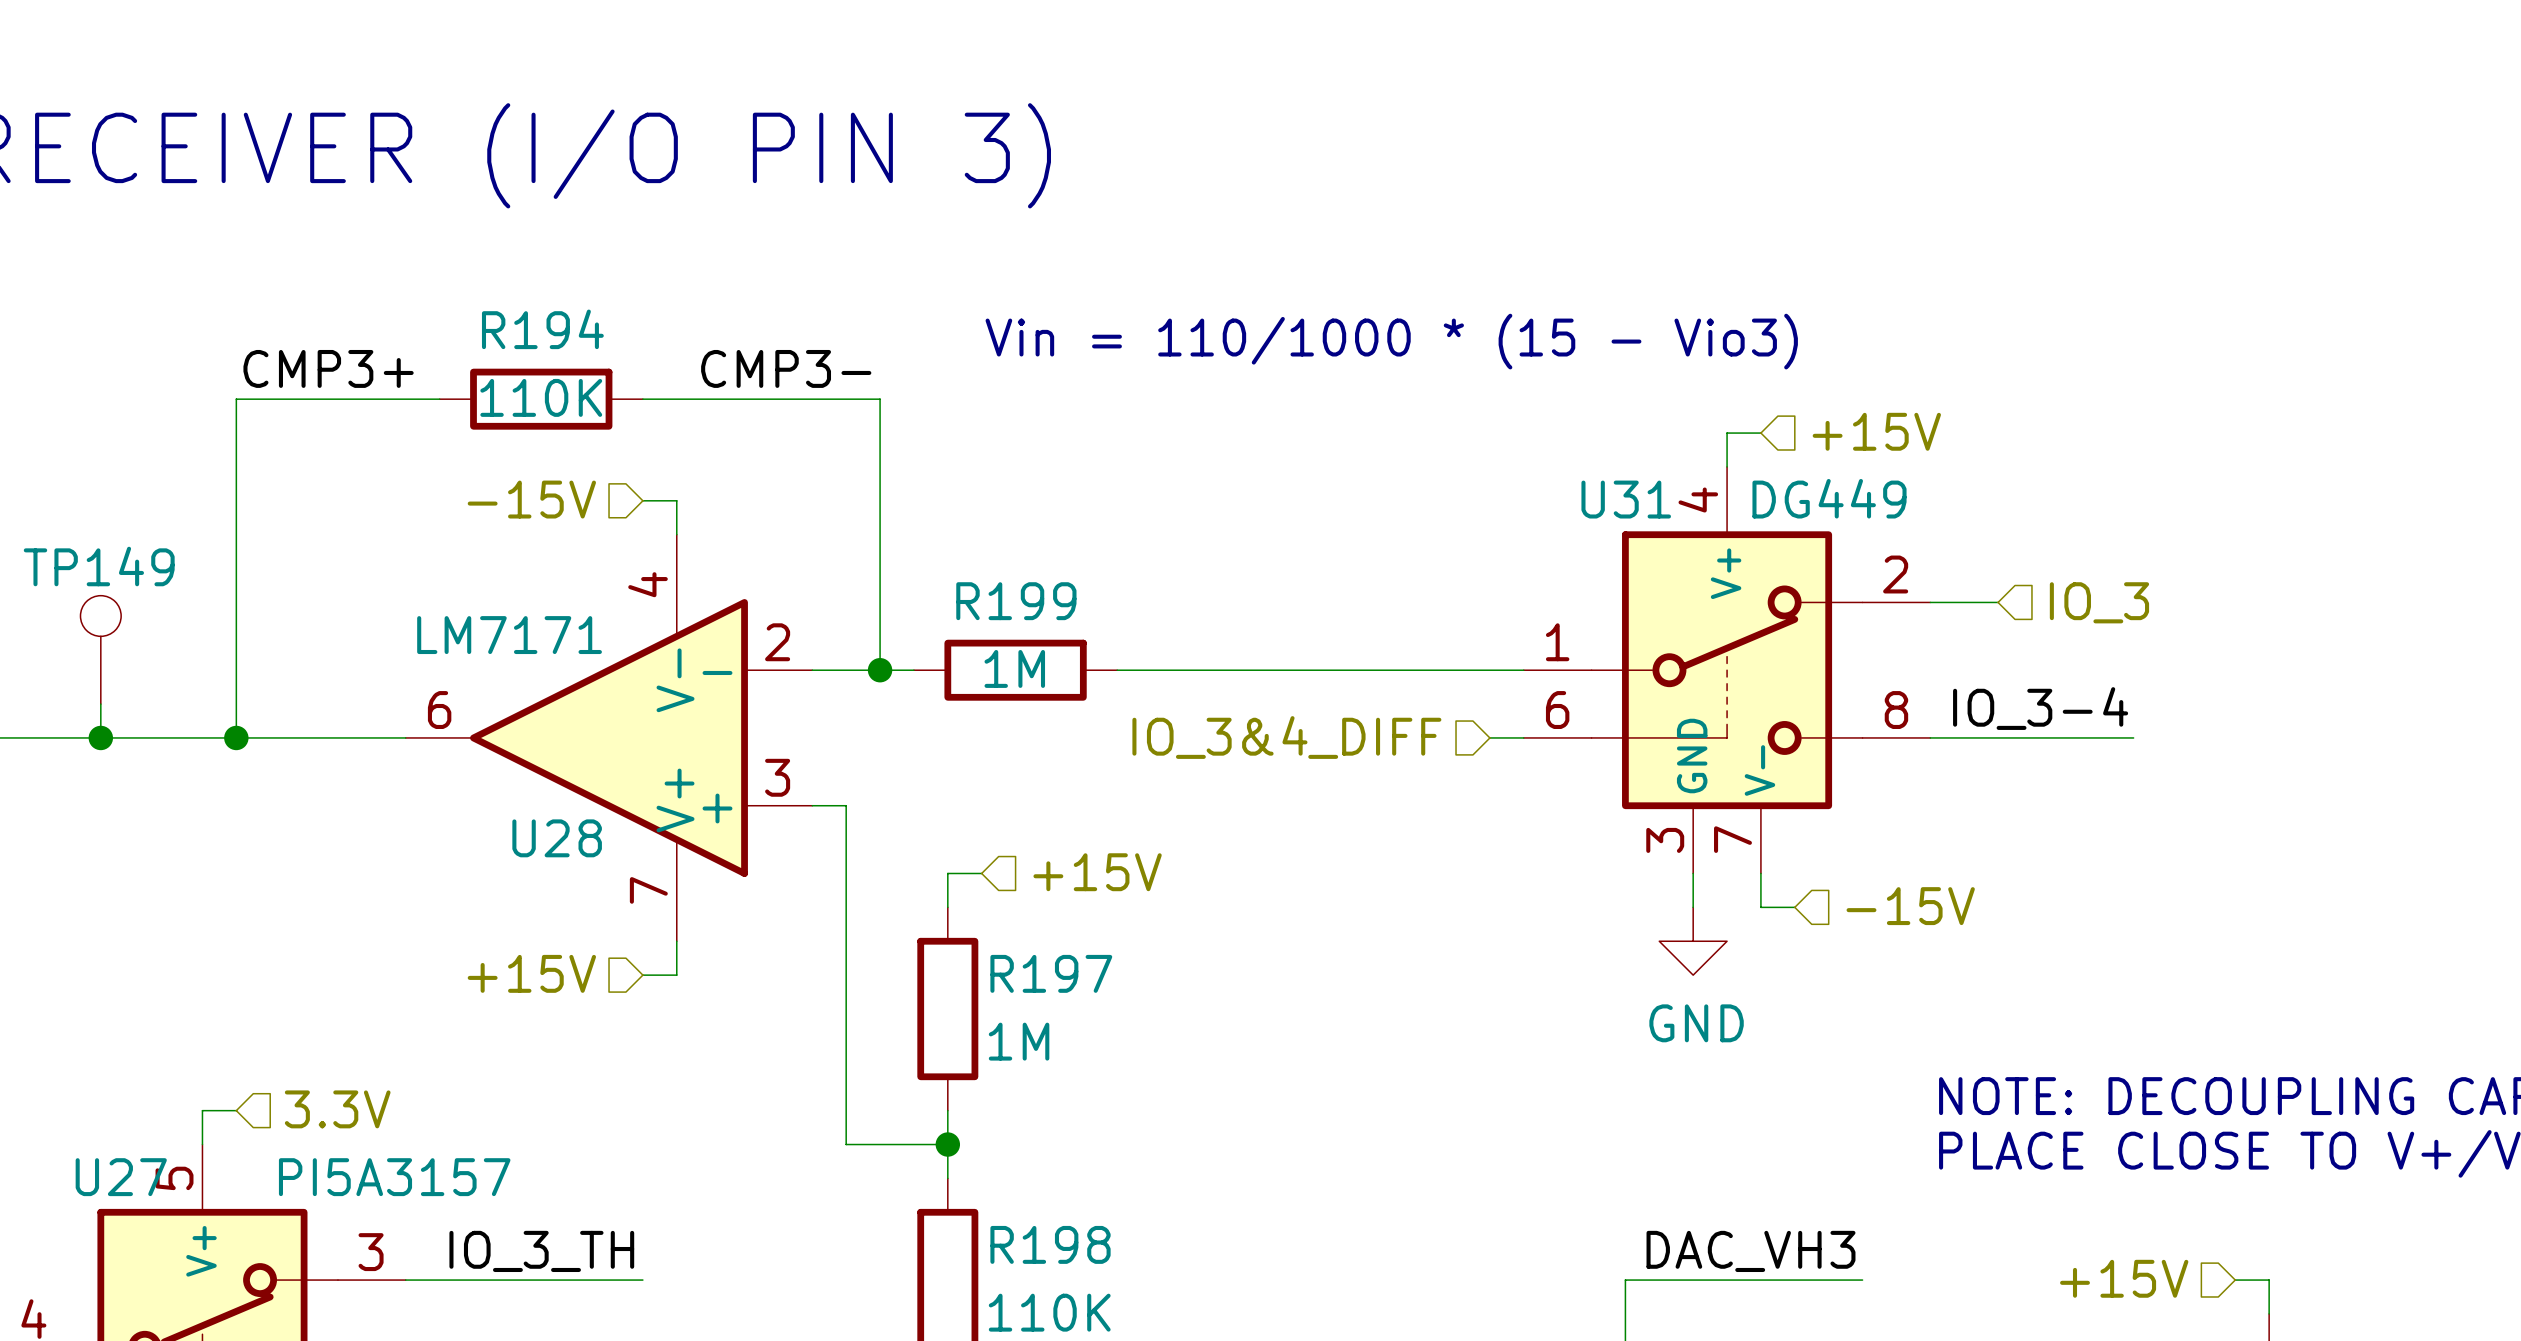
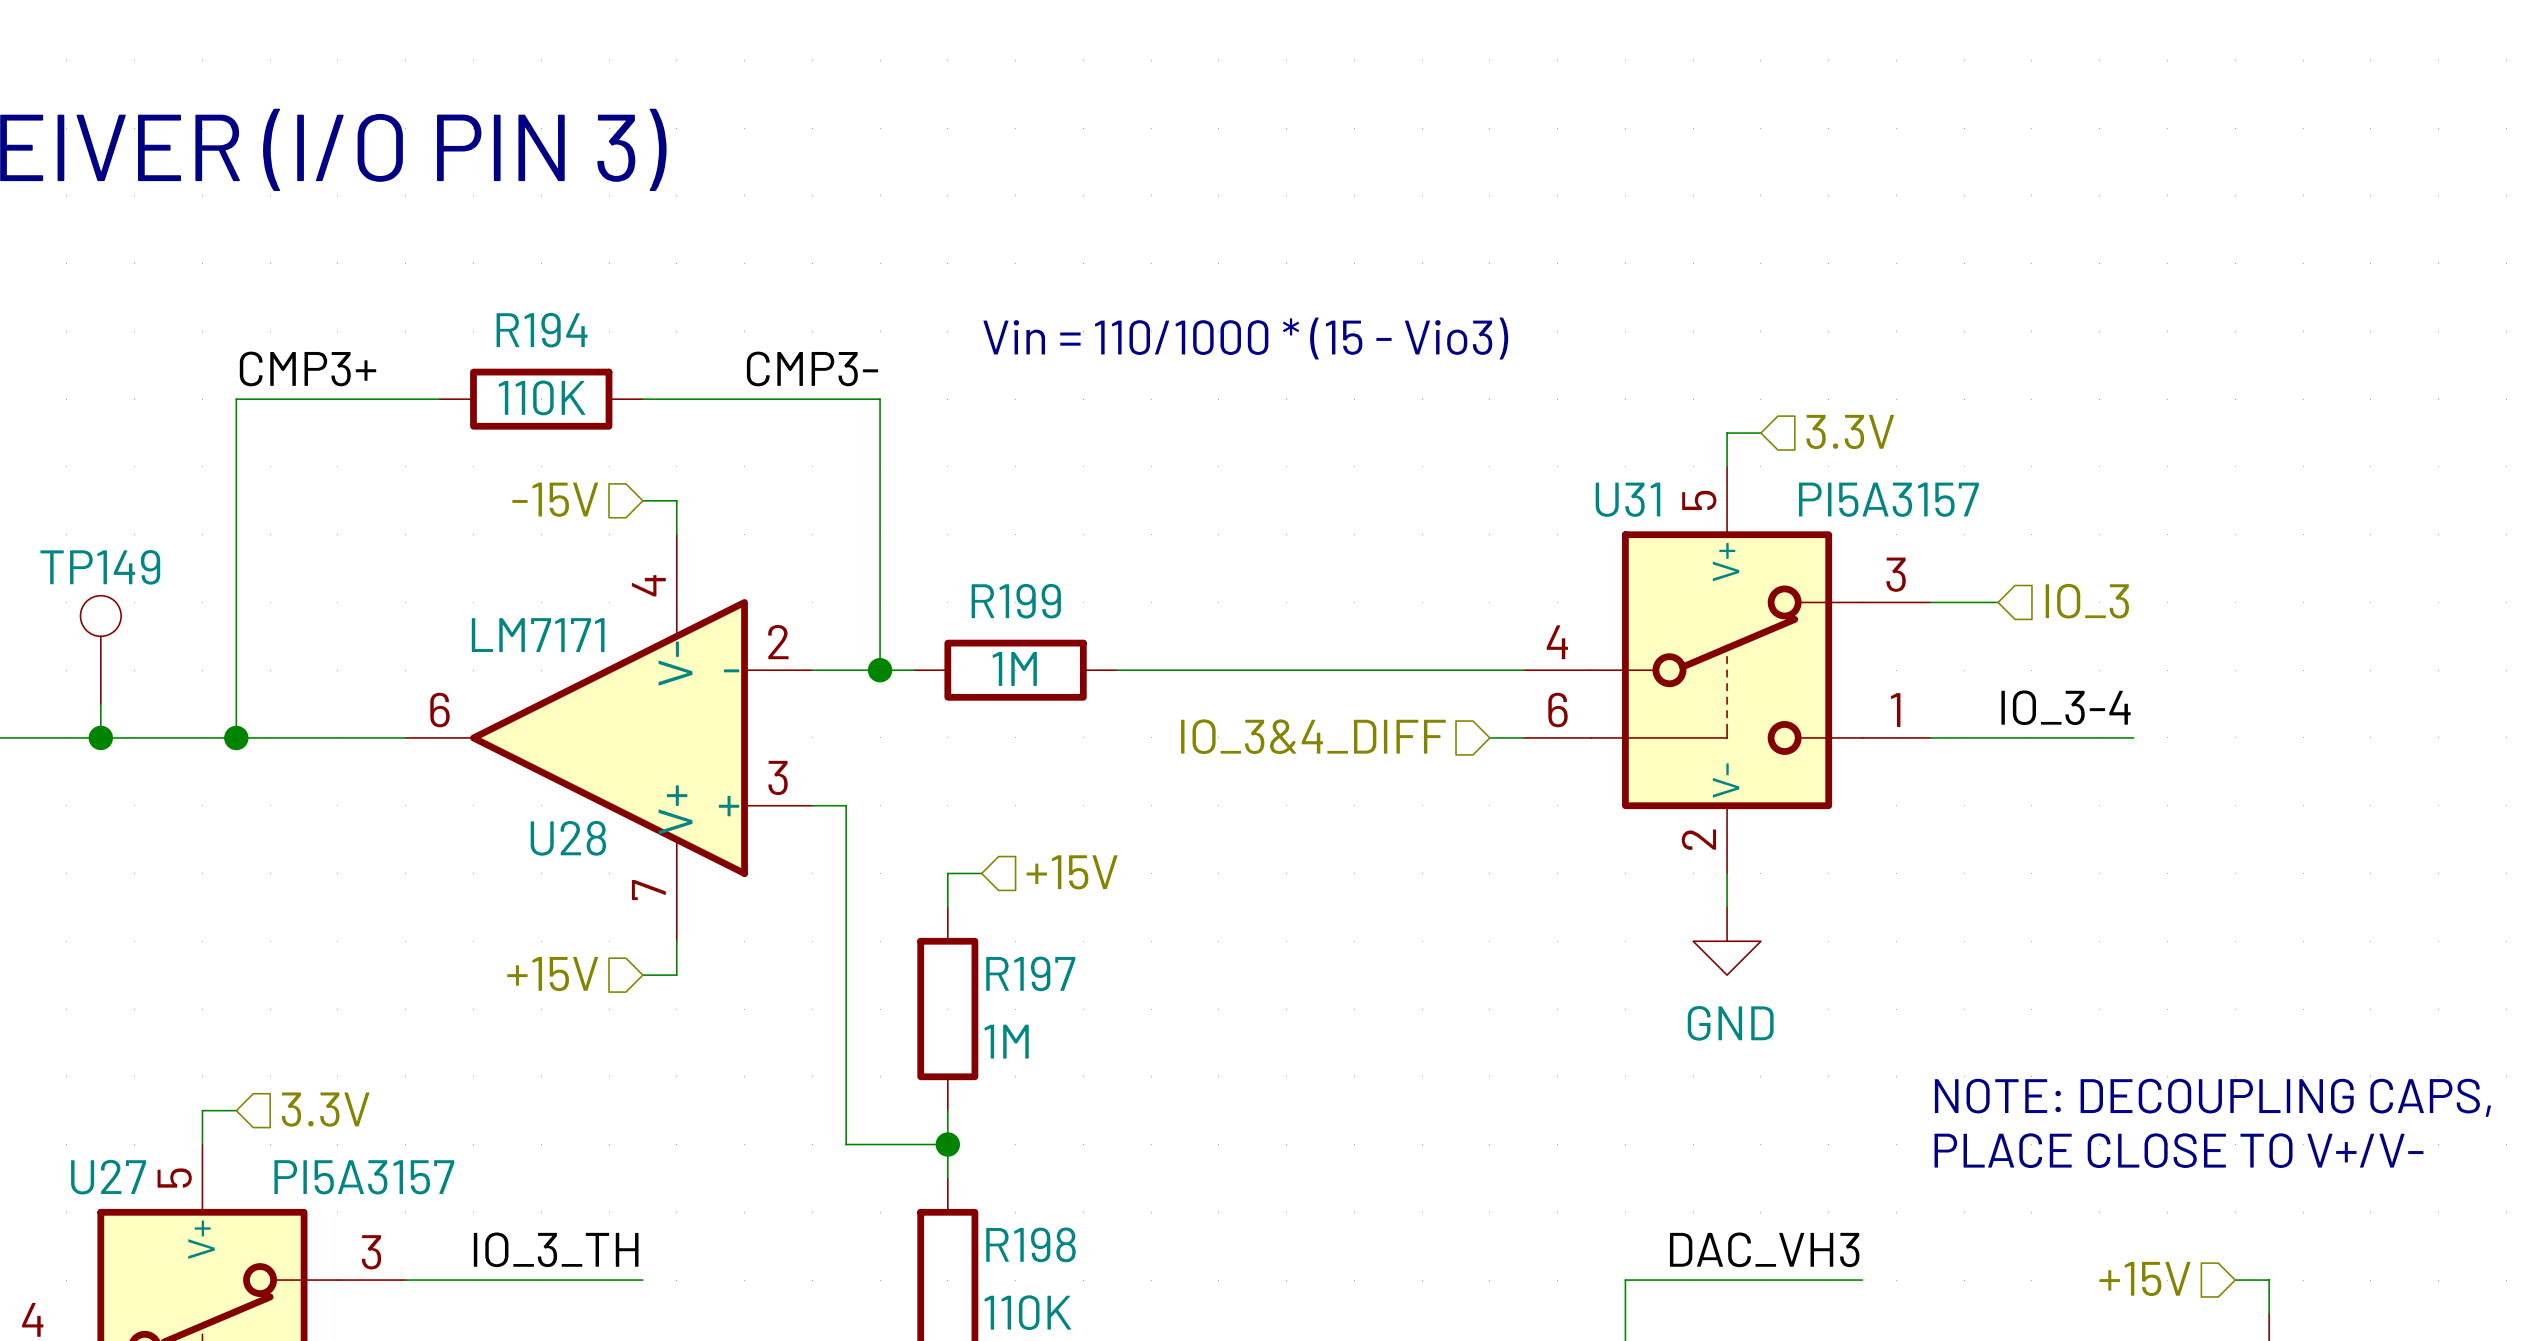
hierarchical label: +15V (1876, 431) -> 3.3V (1850, 431)
U31 symbol: [1523, 466, 1931, 874] -> [1523, 466, 1931, 874]
U31 value: DG449 (1829, 498) -> PI5A3157 (1888, 499)
wire: (1693, 873) (1693, 907) -> (1727, 873) (1727, 907)
wire: (1760, 873) (1760, 907) (1794, 907) -> none
hierarchical label: -15V (1910, 906) -> none
power symbol position: GND (1693, 941) -> GND (1727, 941)

